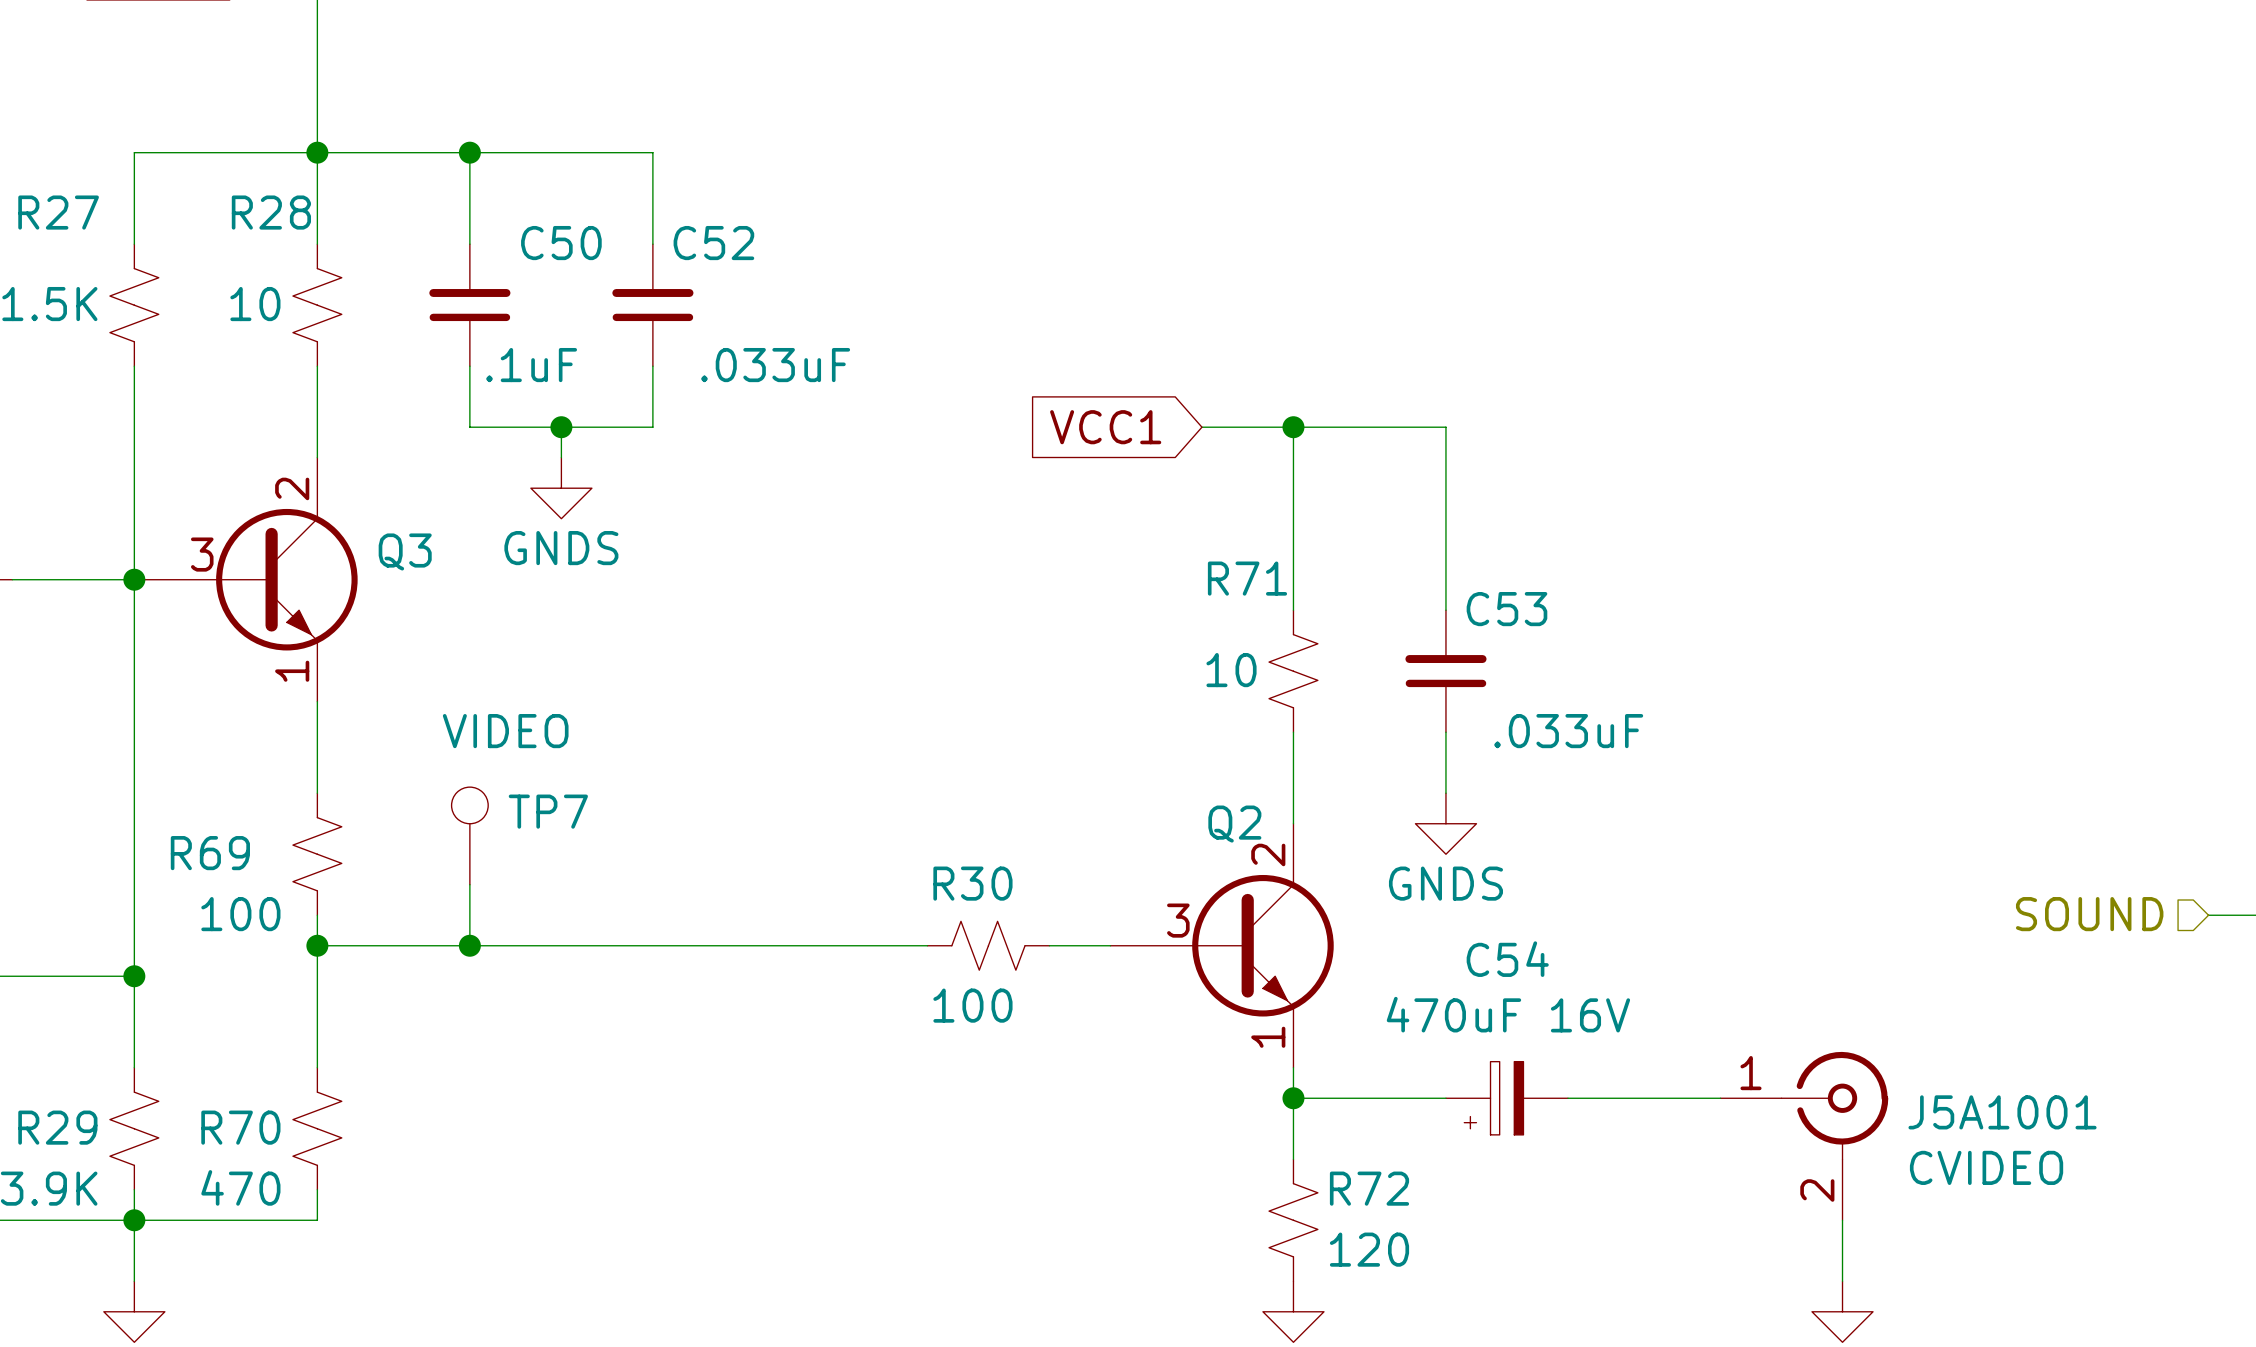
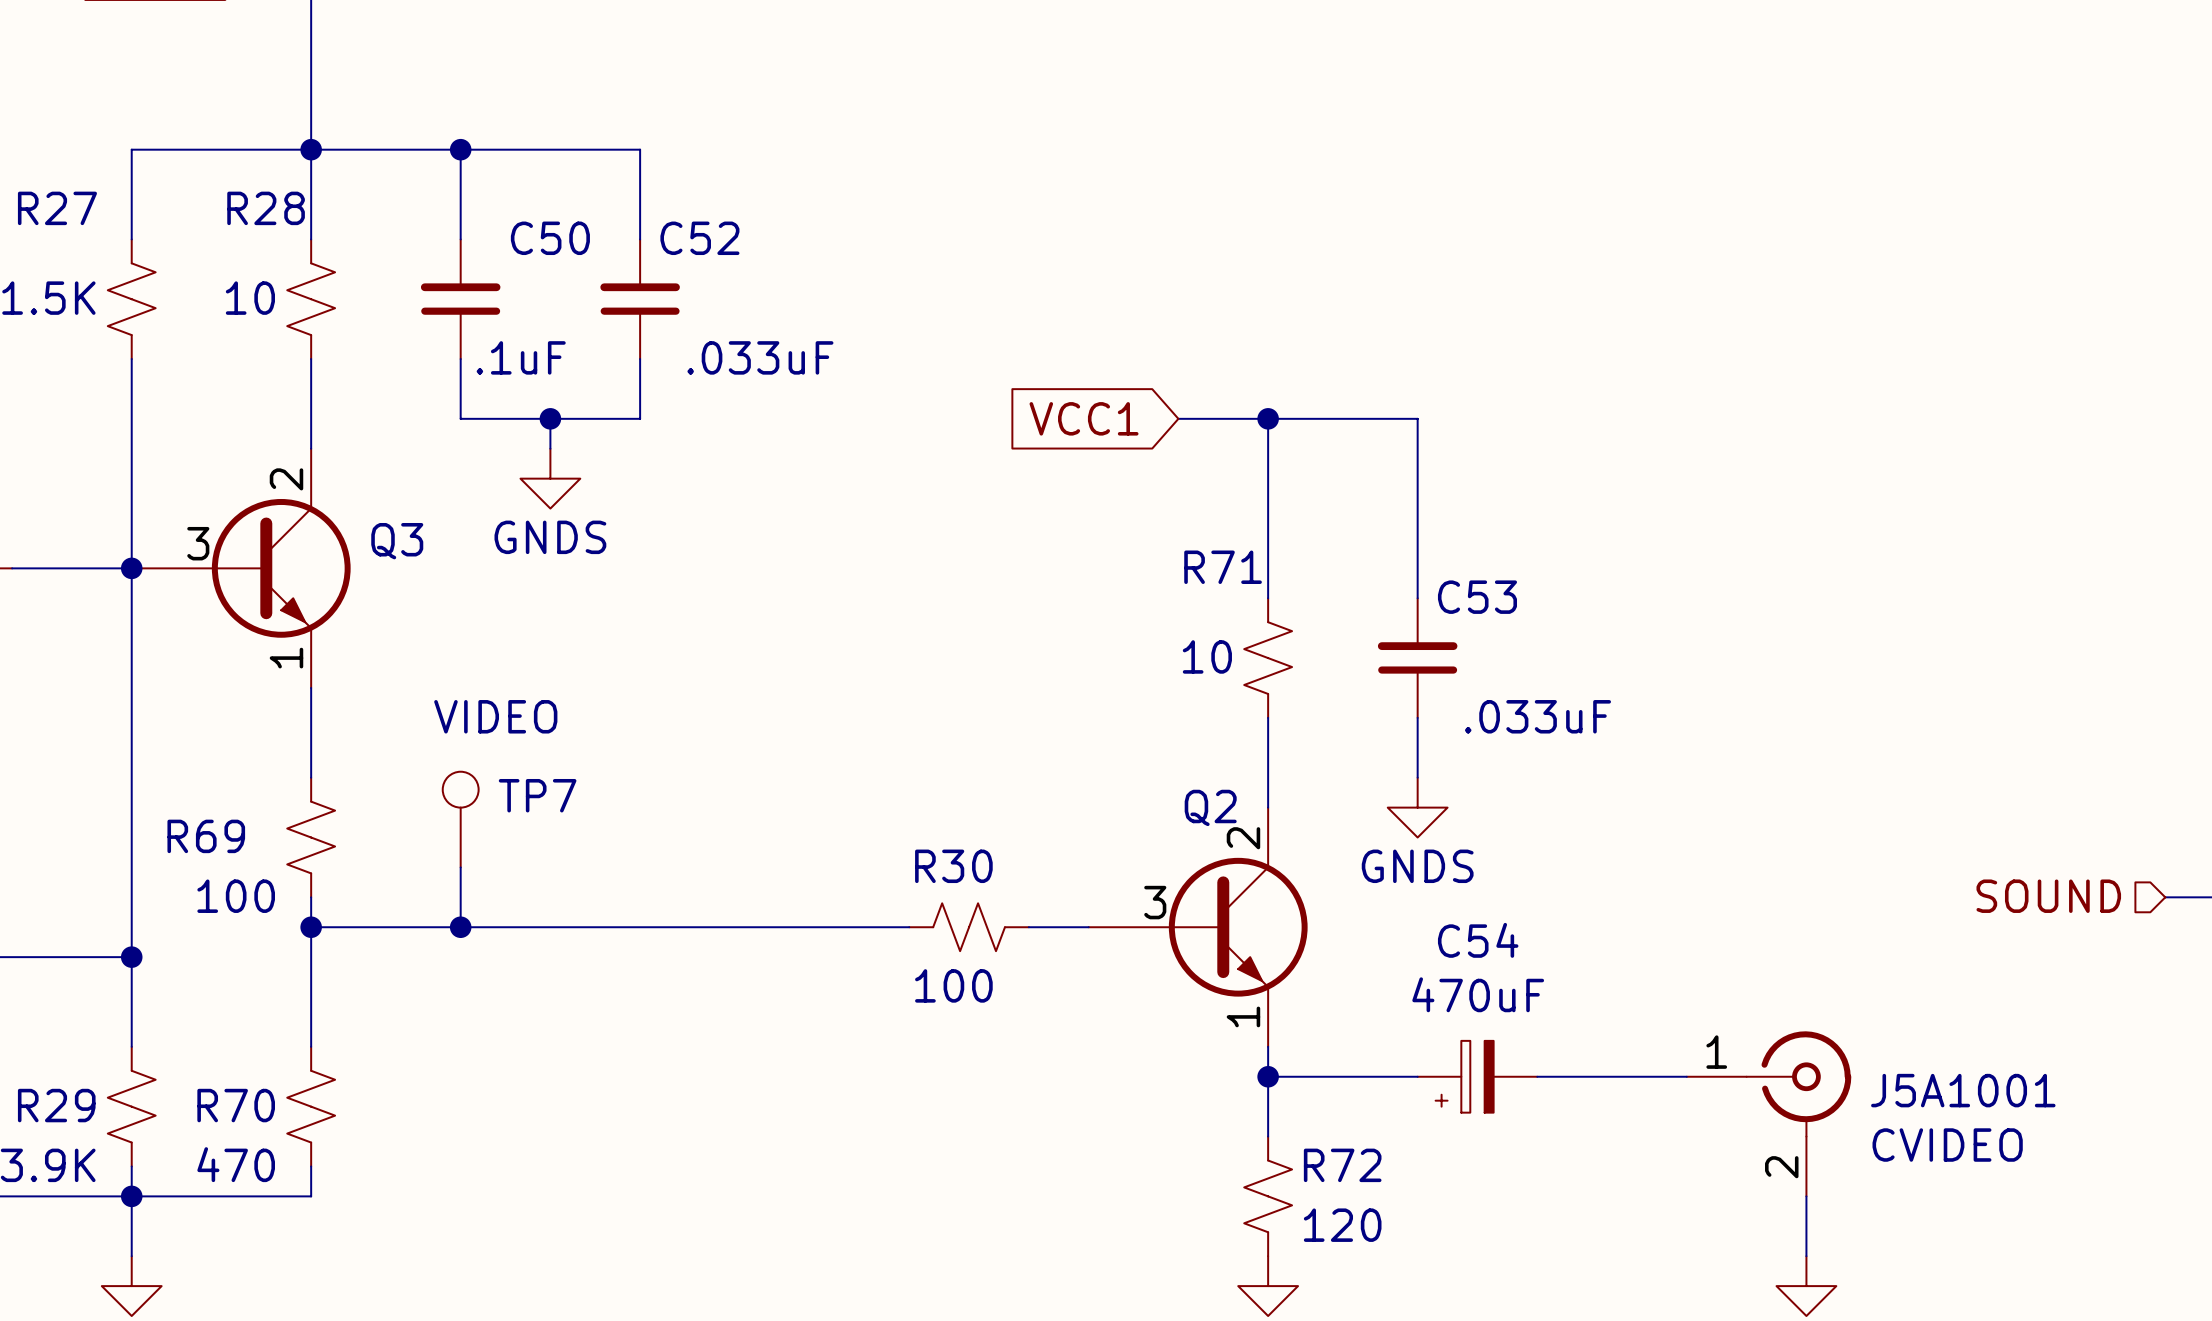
C54 value: 470uF 16V (1508, 1014) -> 470uF (1478, 994)

